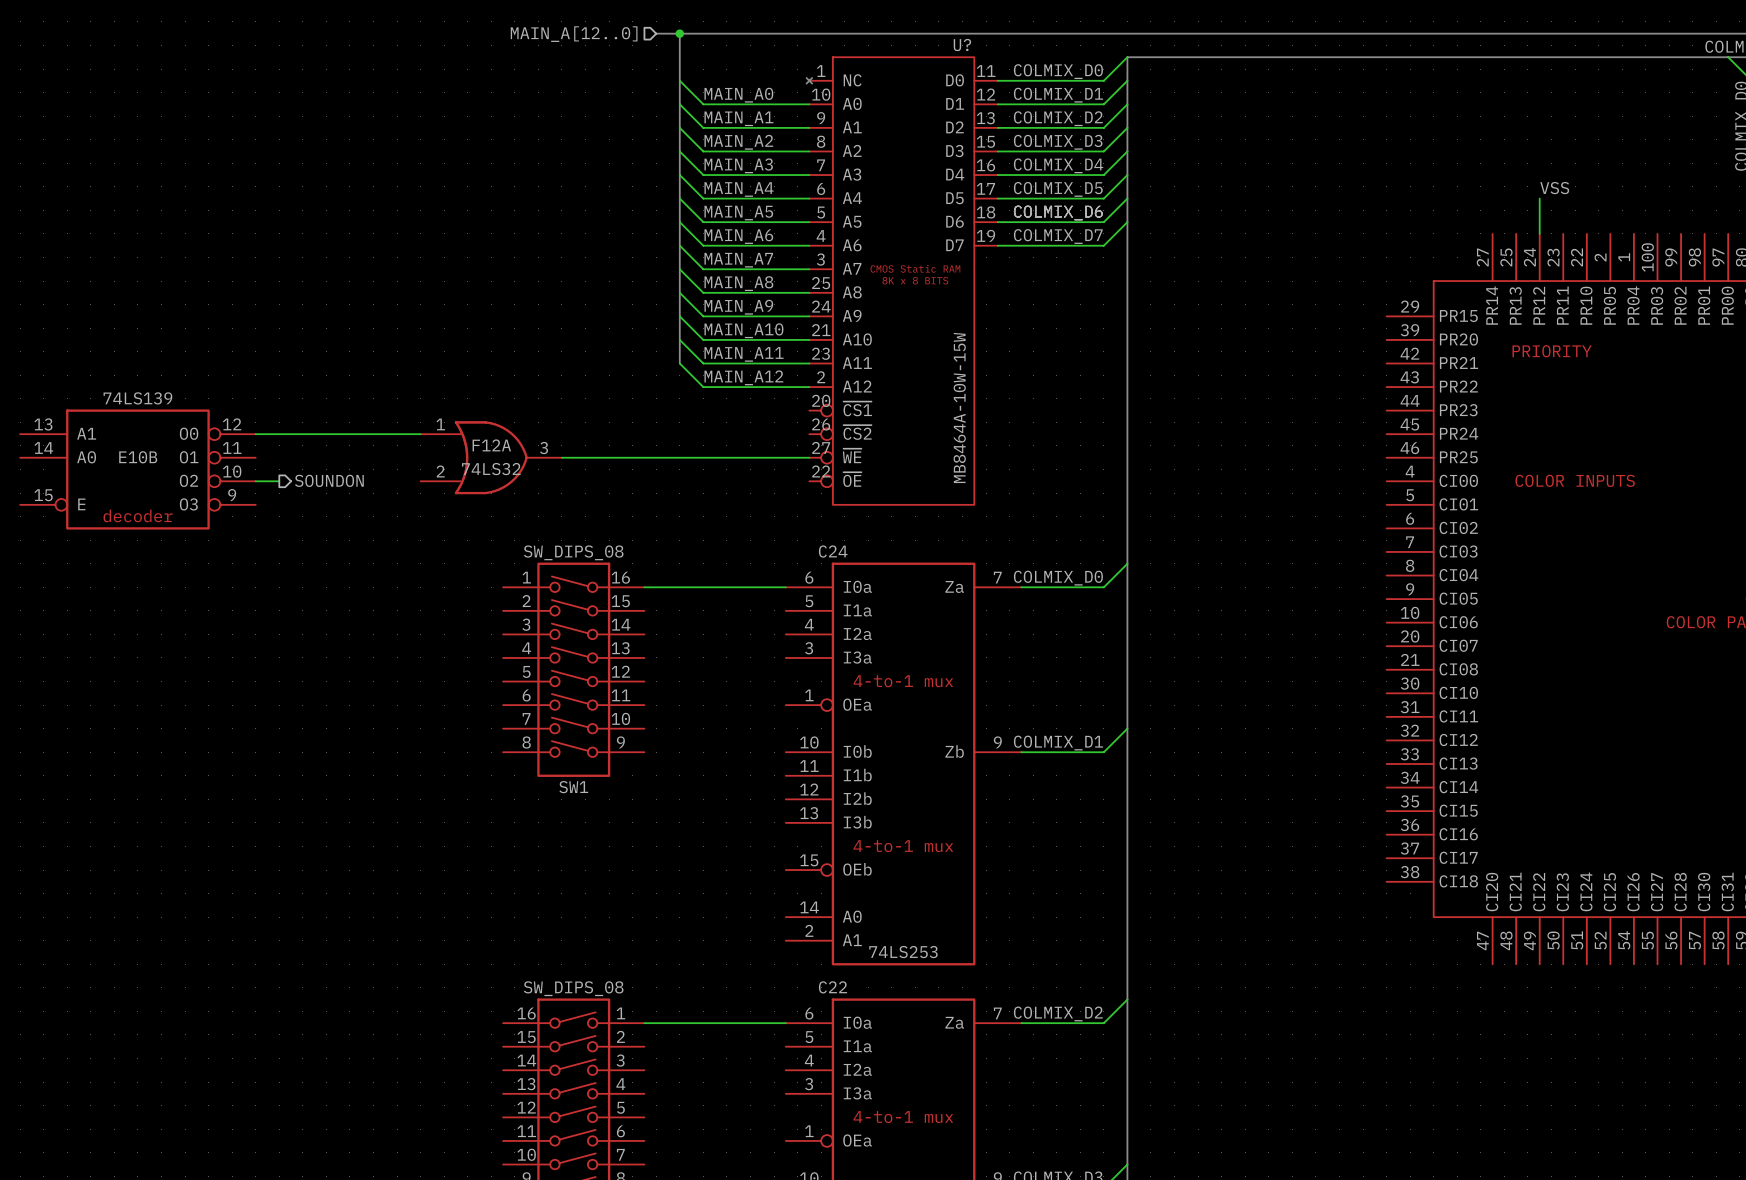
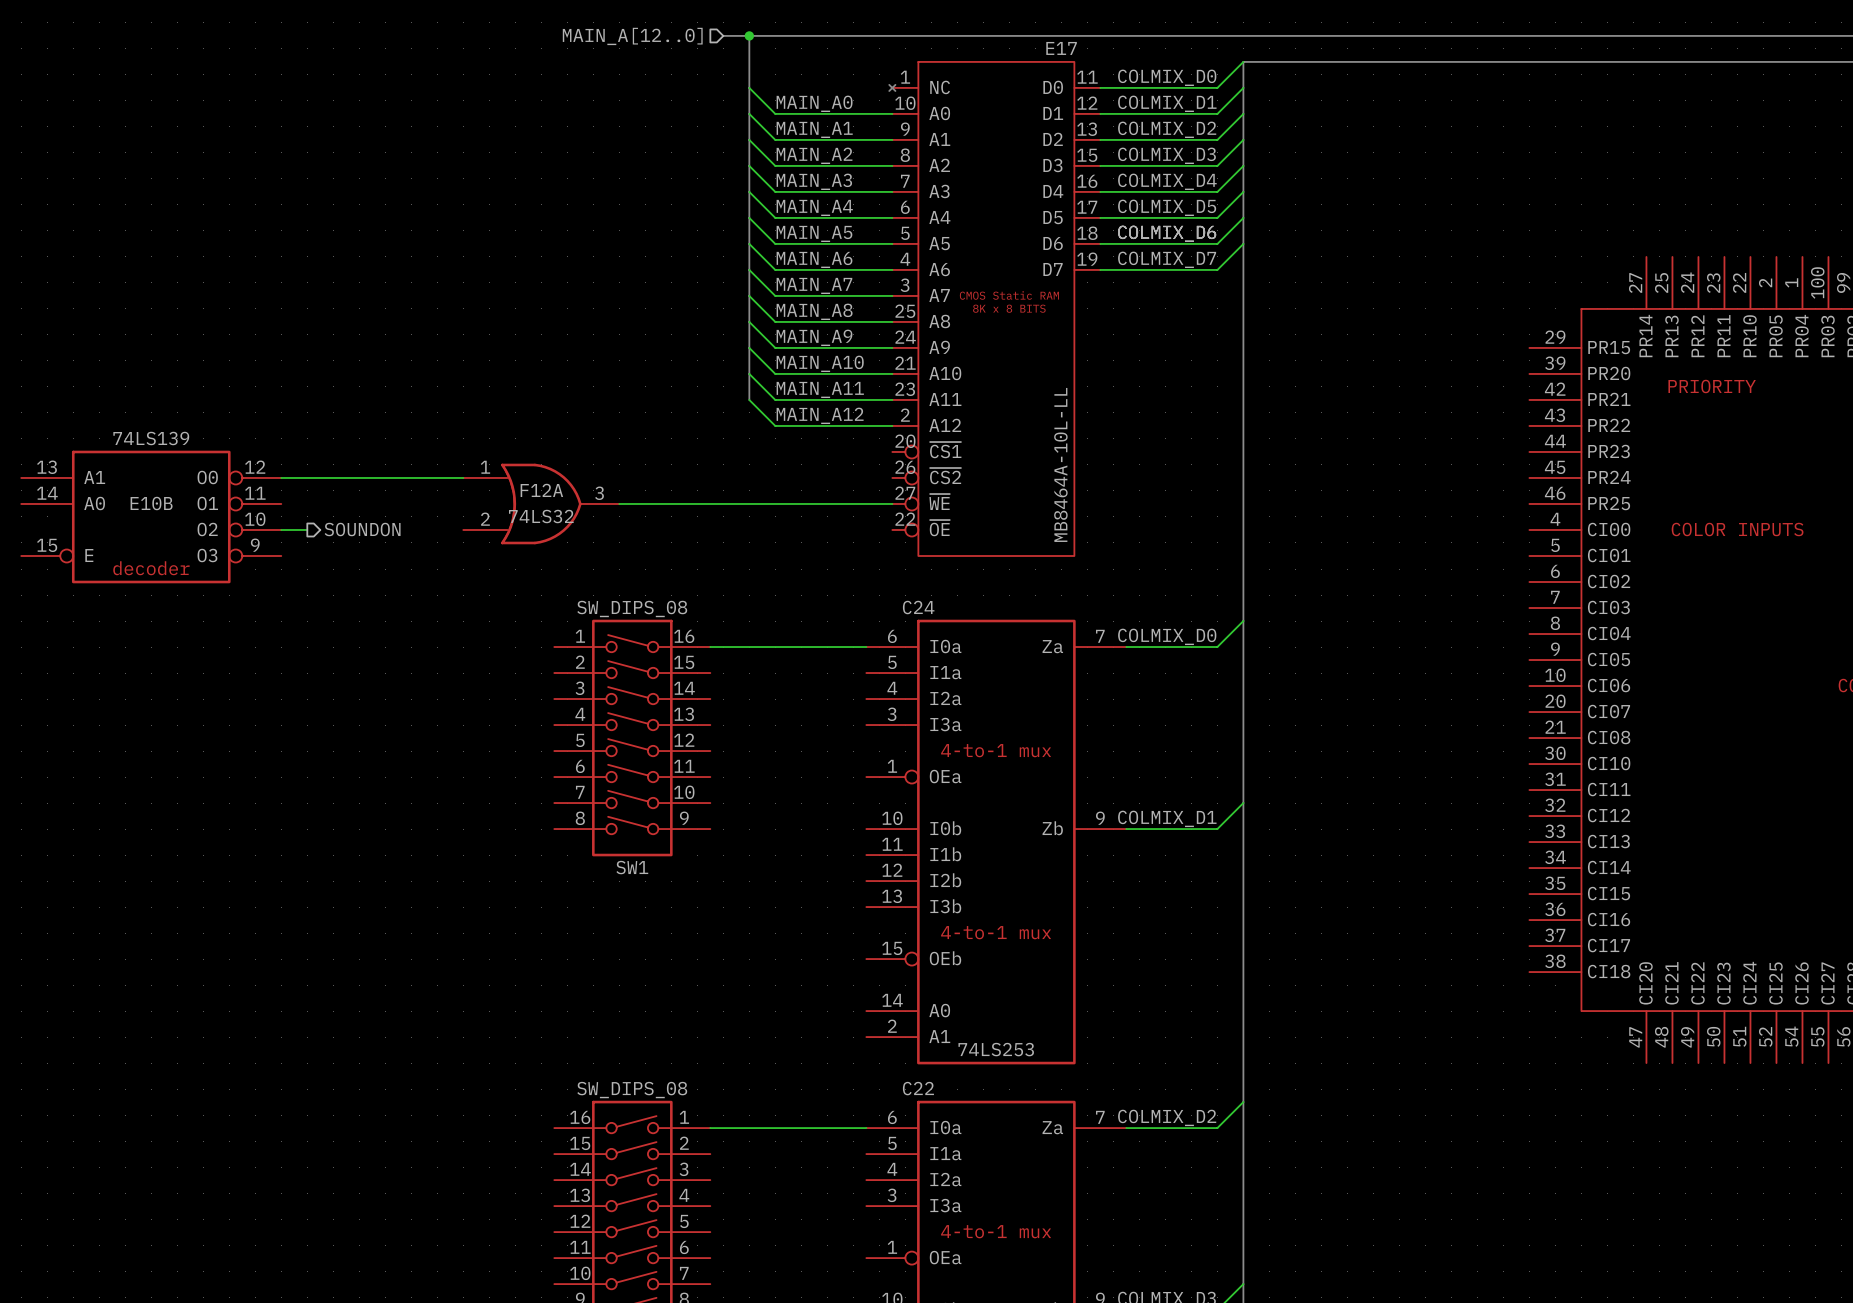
U? name: U? (962, 45) -> E17 (1061, 48)
label: VSS (1554, 188) -> none
wire: (1539, 198) (1539, 233) -> none
U? value: MB8464A-10W-15W (959, 407) -> MB8464A-10L-LL (1060, 464)

